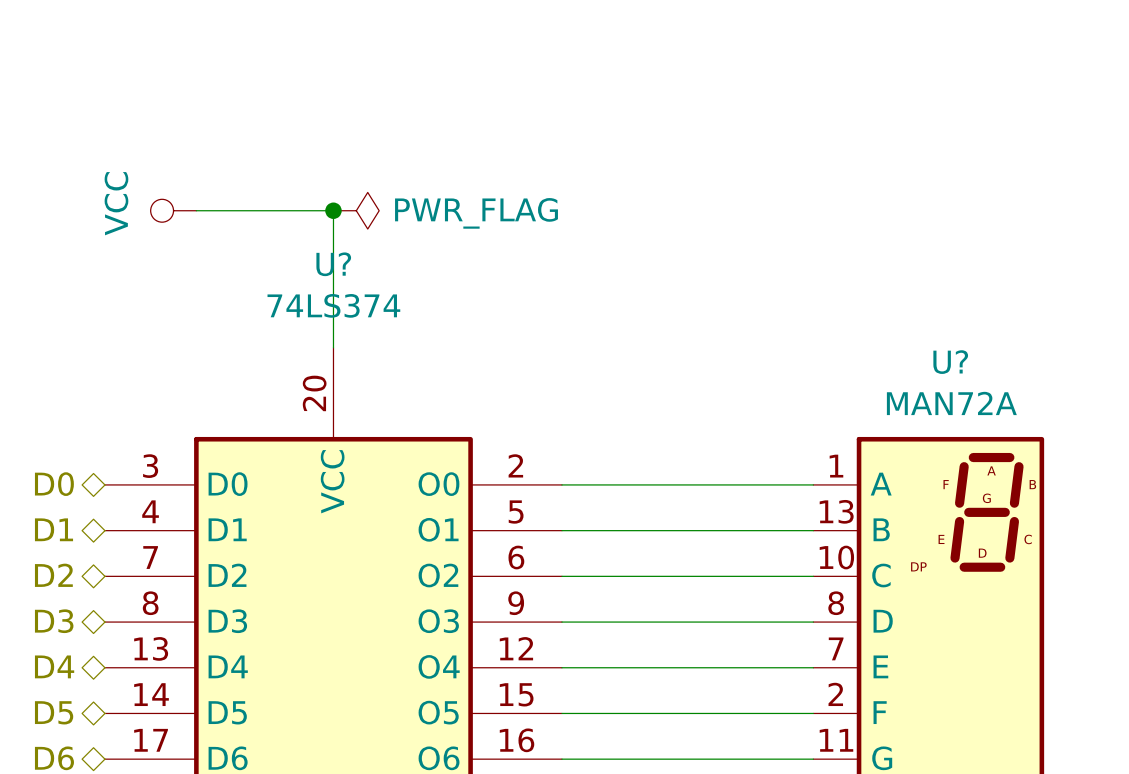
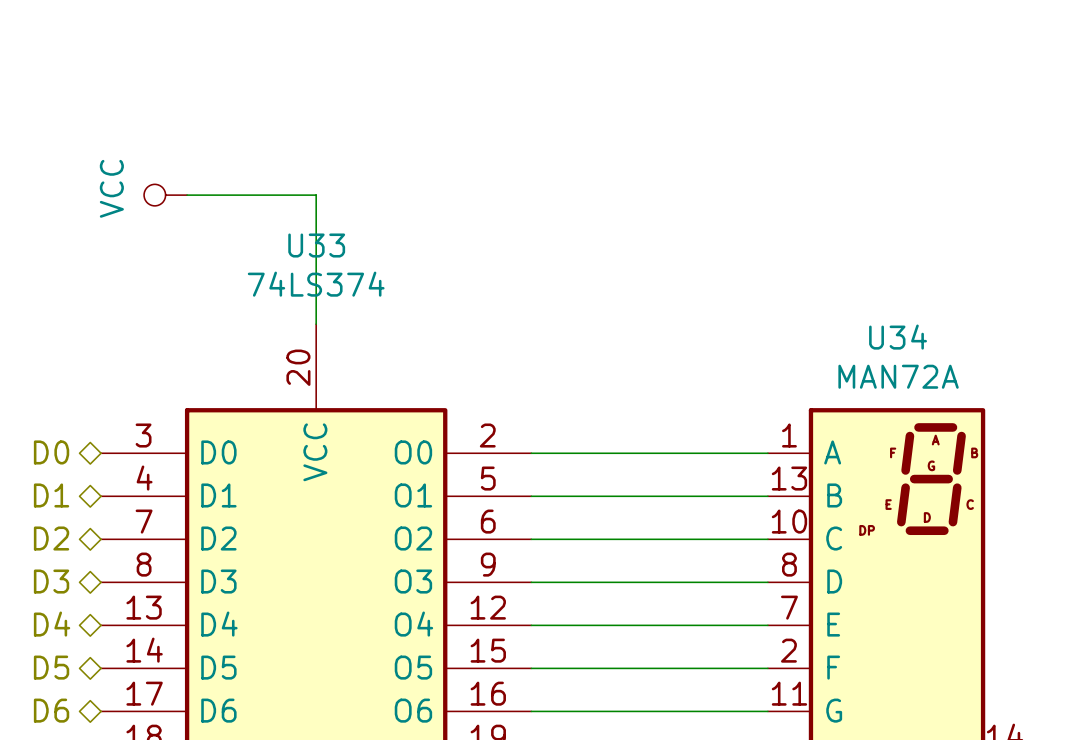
junction: (333, 210) -> none
power symbol: PWR_FLAG (356, 210) -> none
U? name: U? (333, 264) -> U33 (316, 245)
U? name: U? (950, 362) -> U34 (898, 337)

